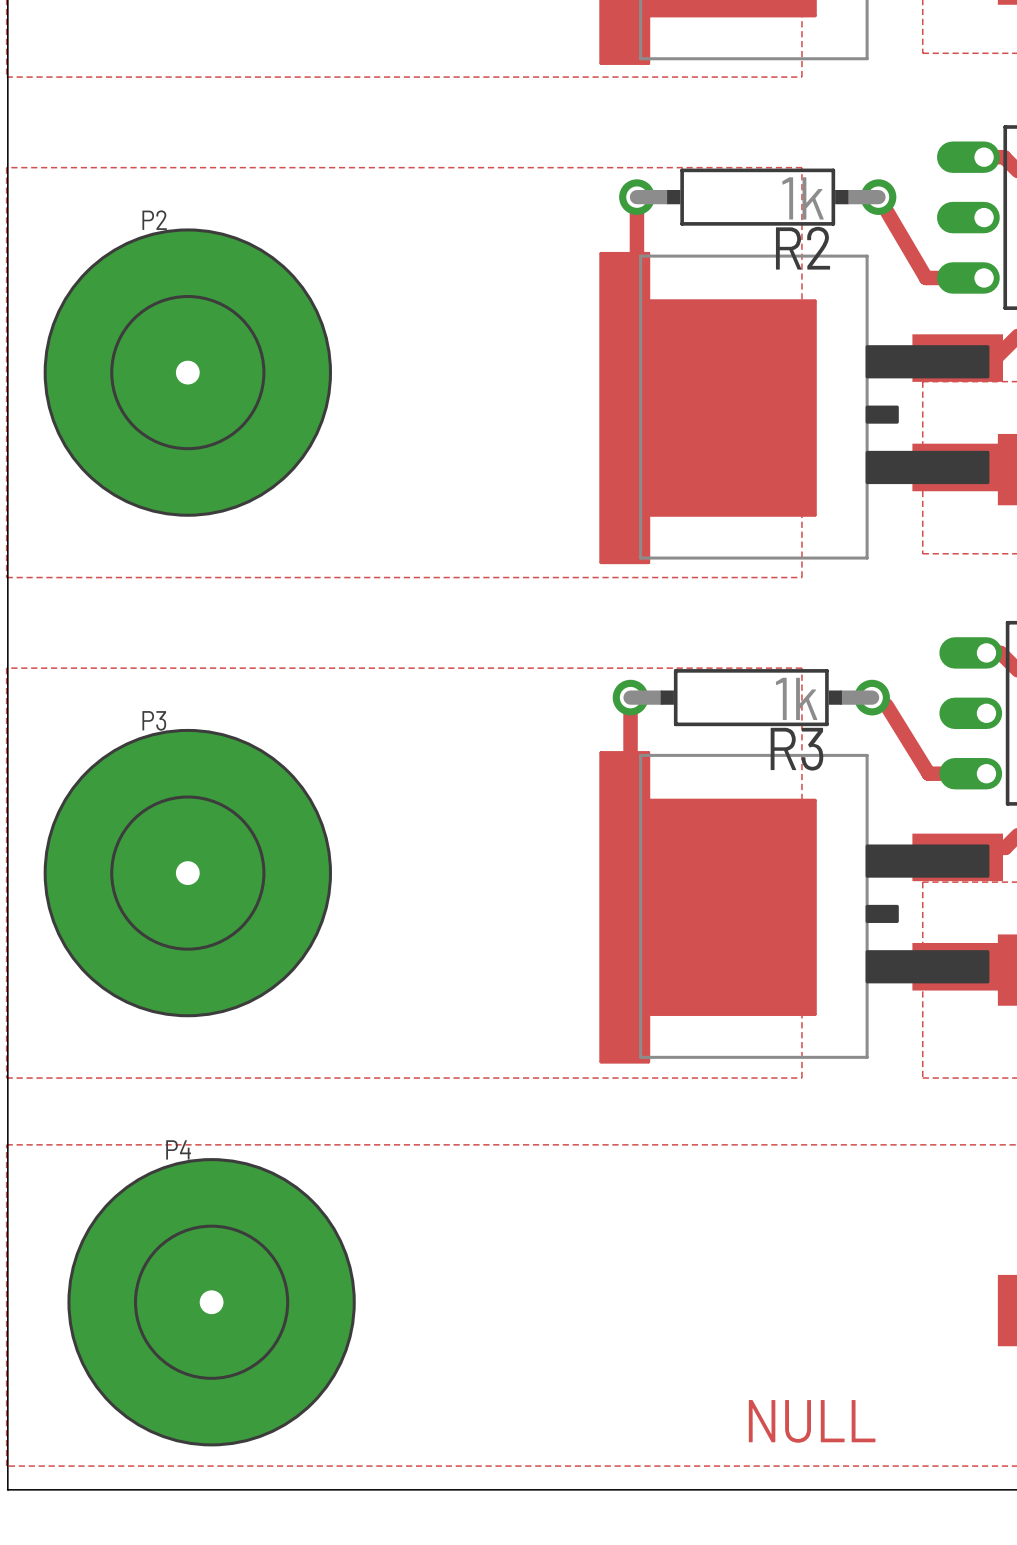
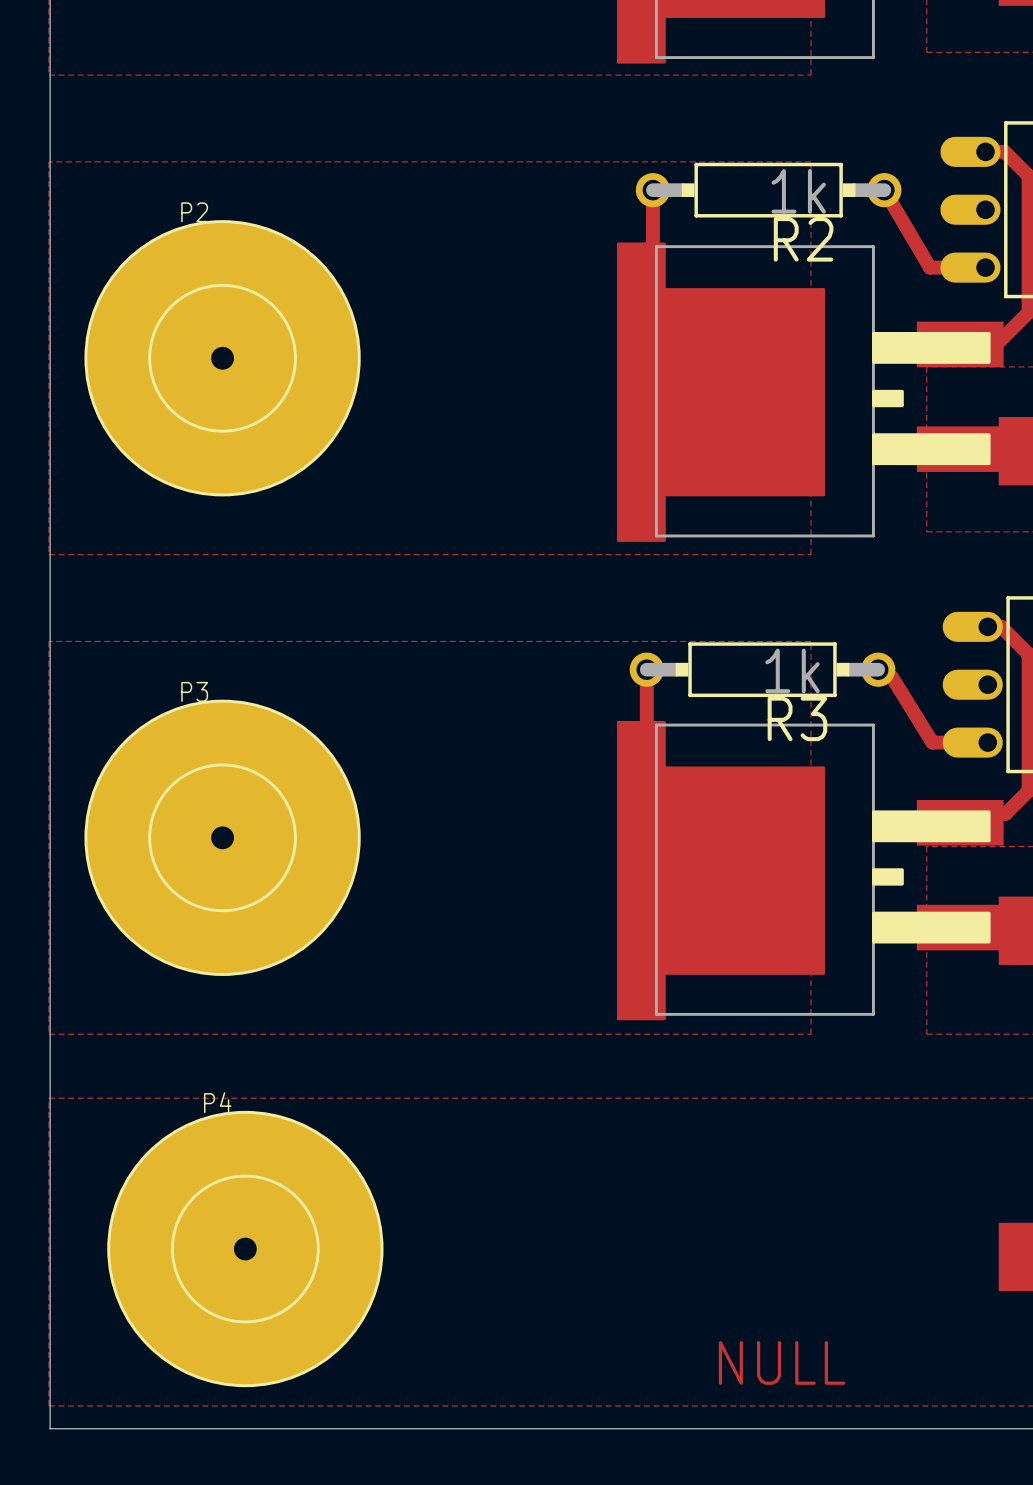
text position: NULL (812, 1421) -> NULL (782, 1362)

